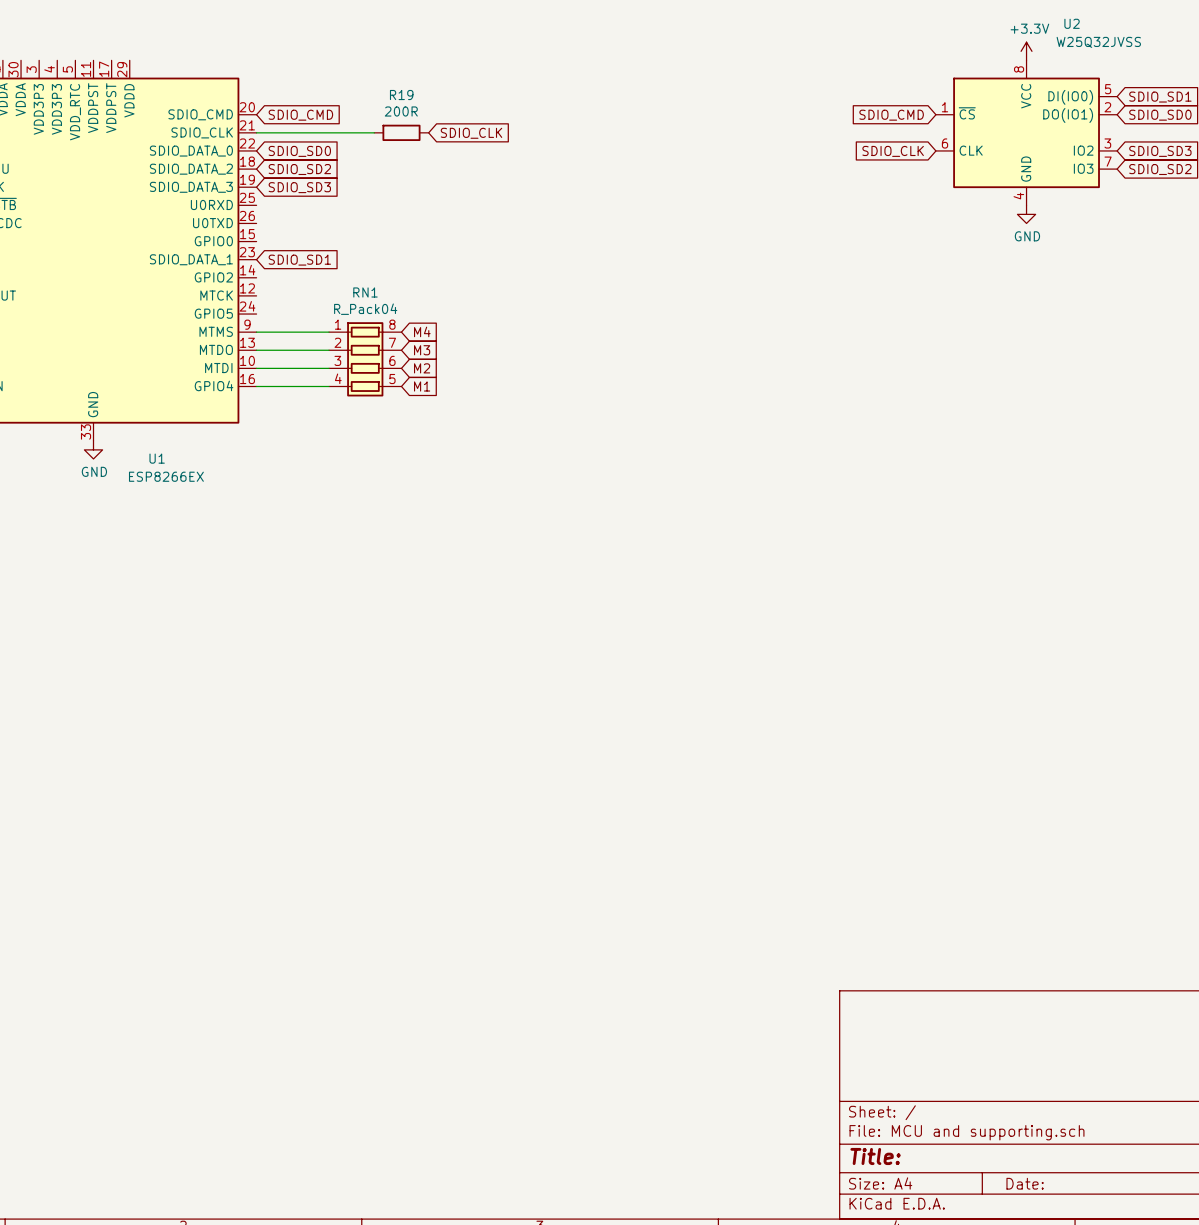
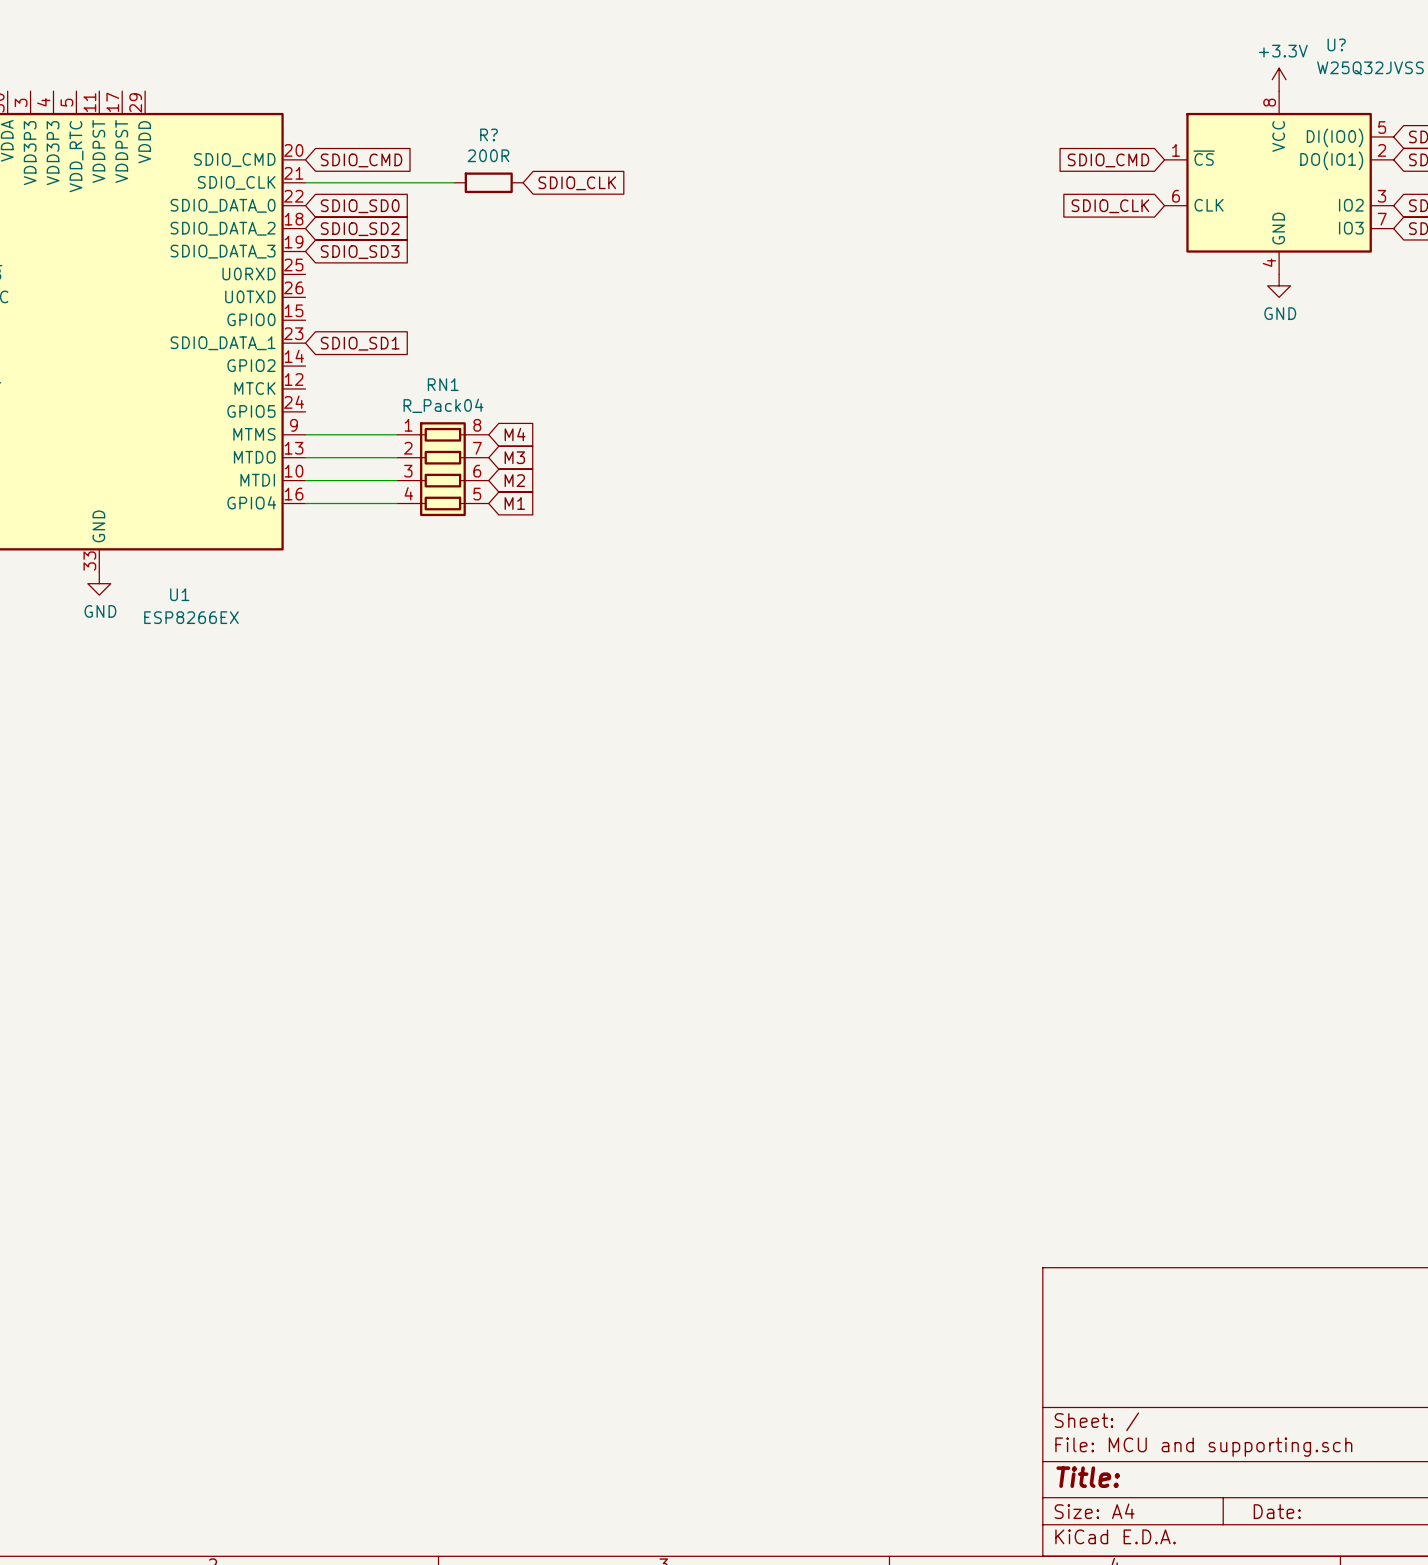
U2 name: U2 (1072, 23) -> U? (1336, 44)
R19 name: R19 (401, 95) -> R? (489, 134)

